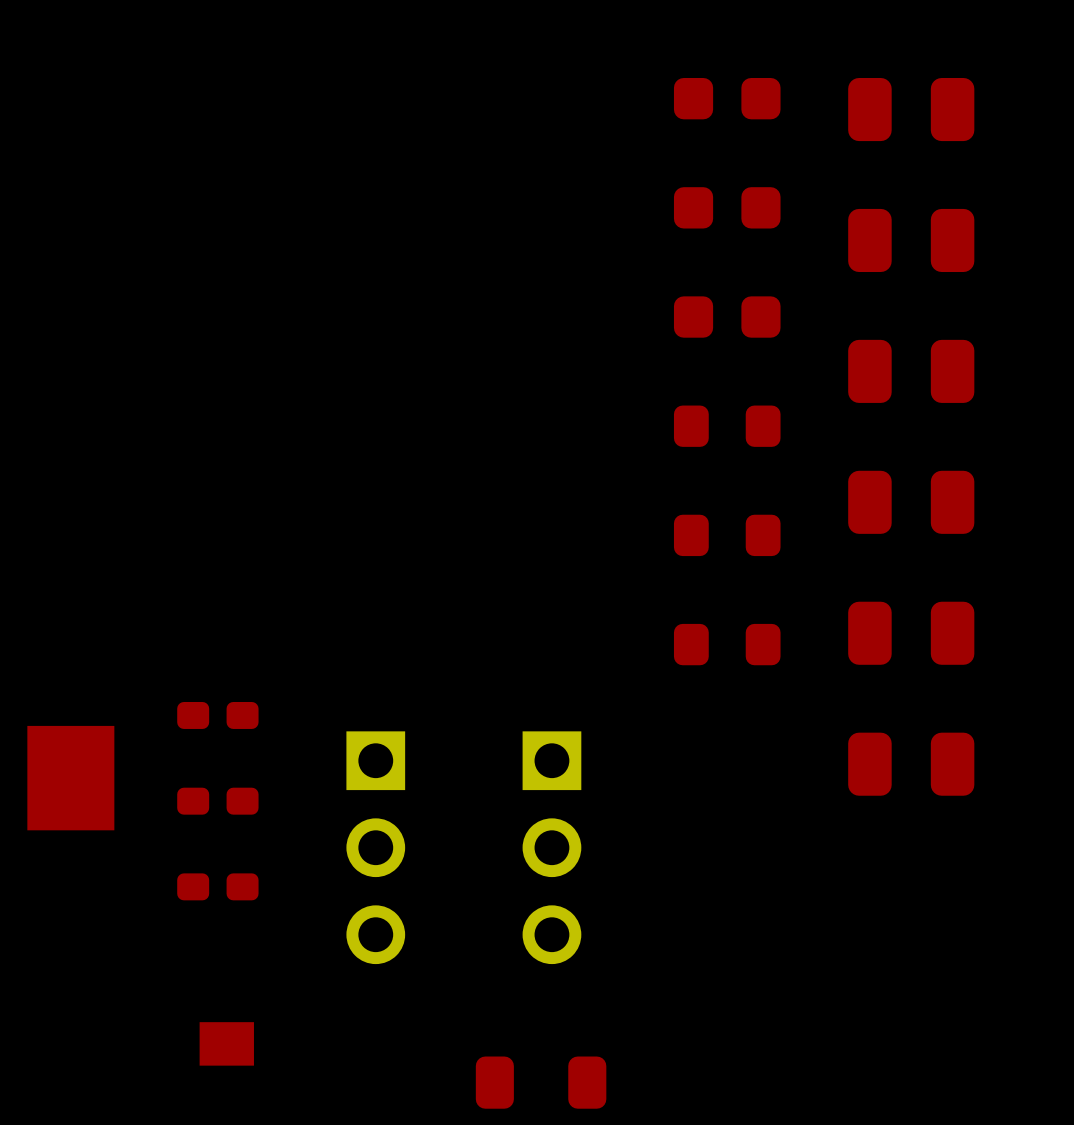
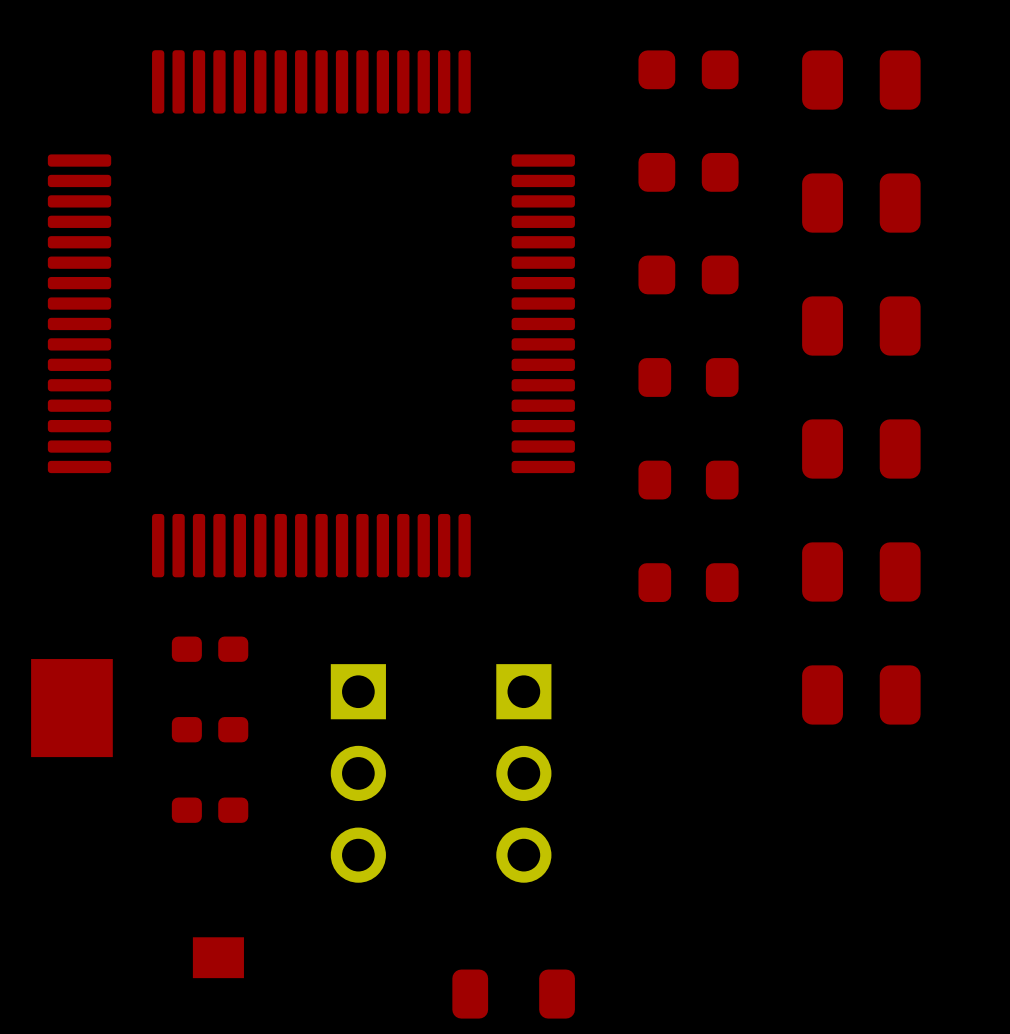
part: none -> (311, 313)

